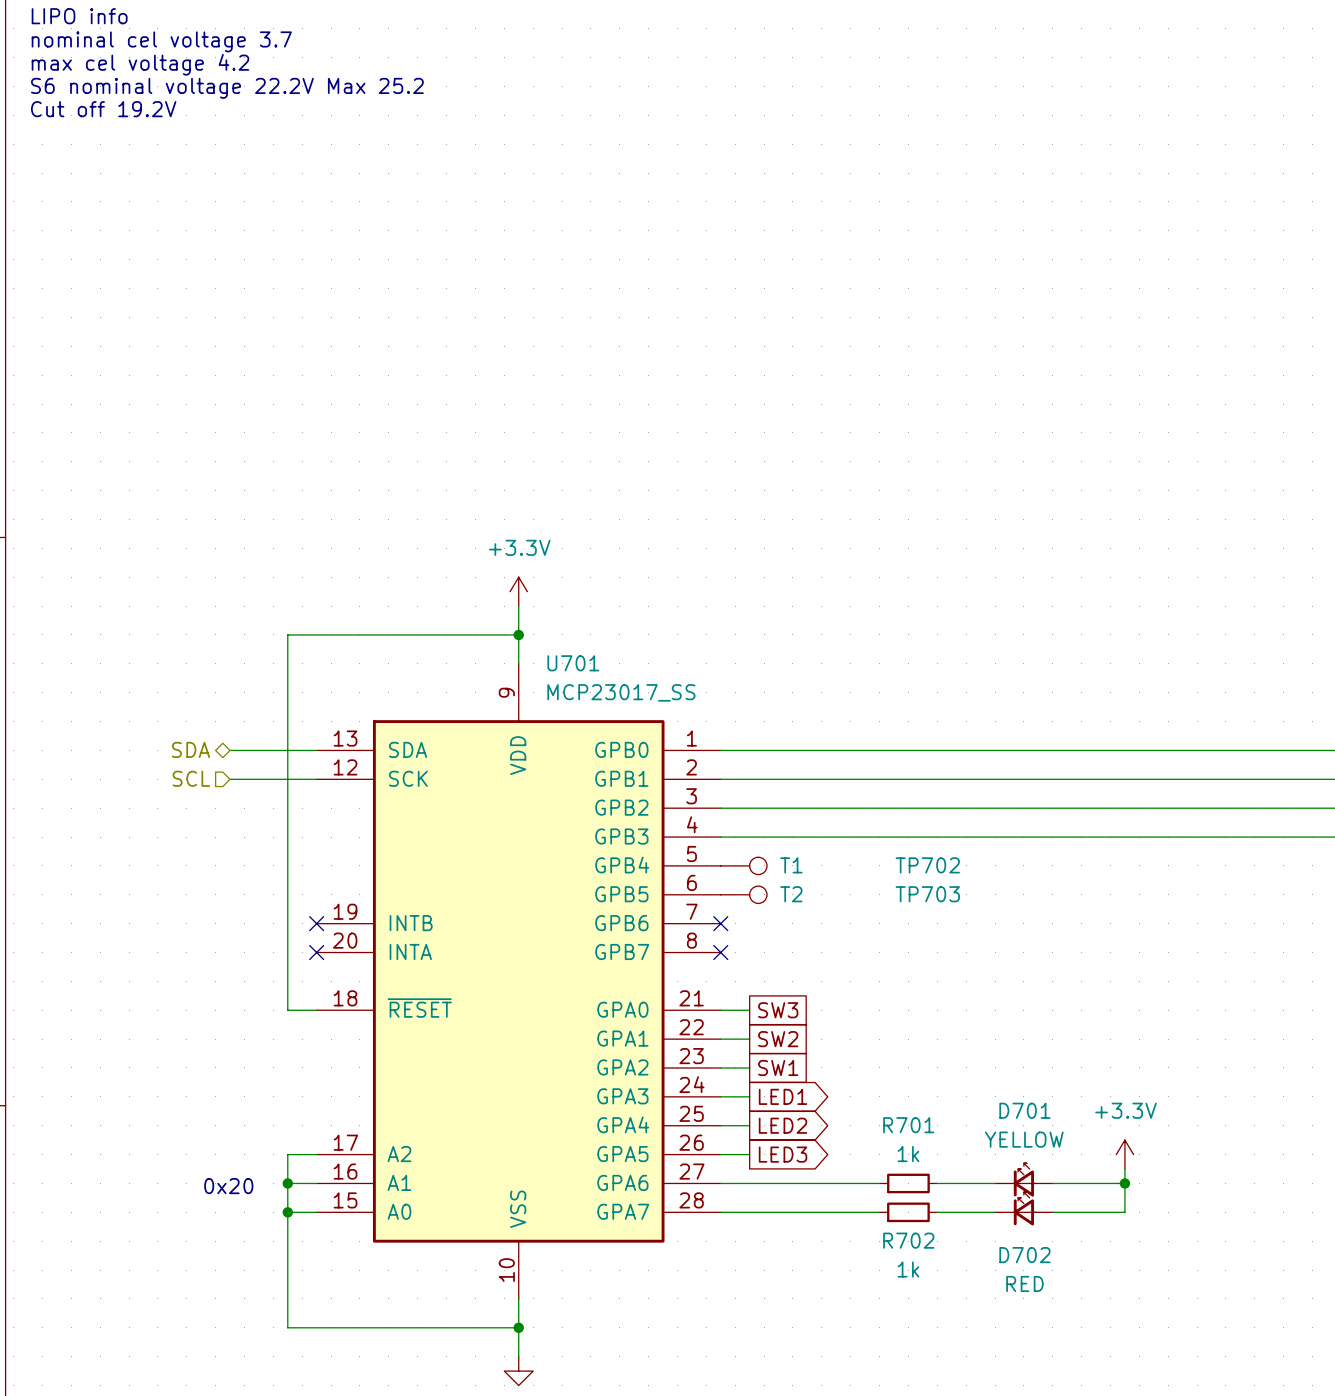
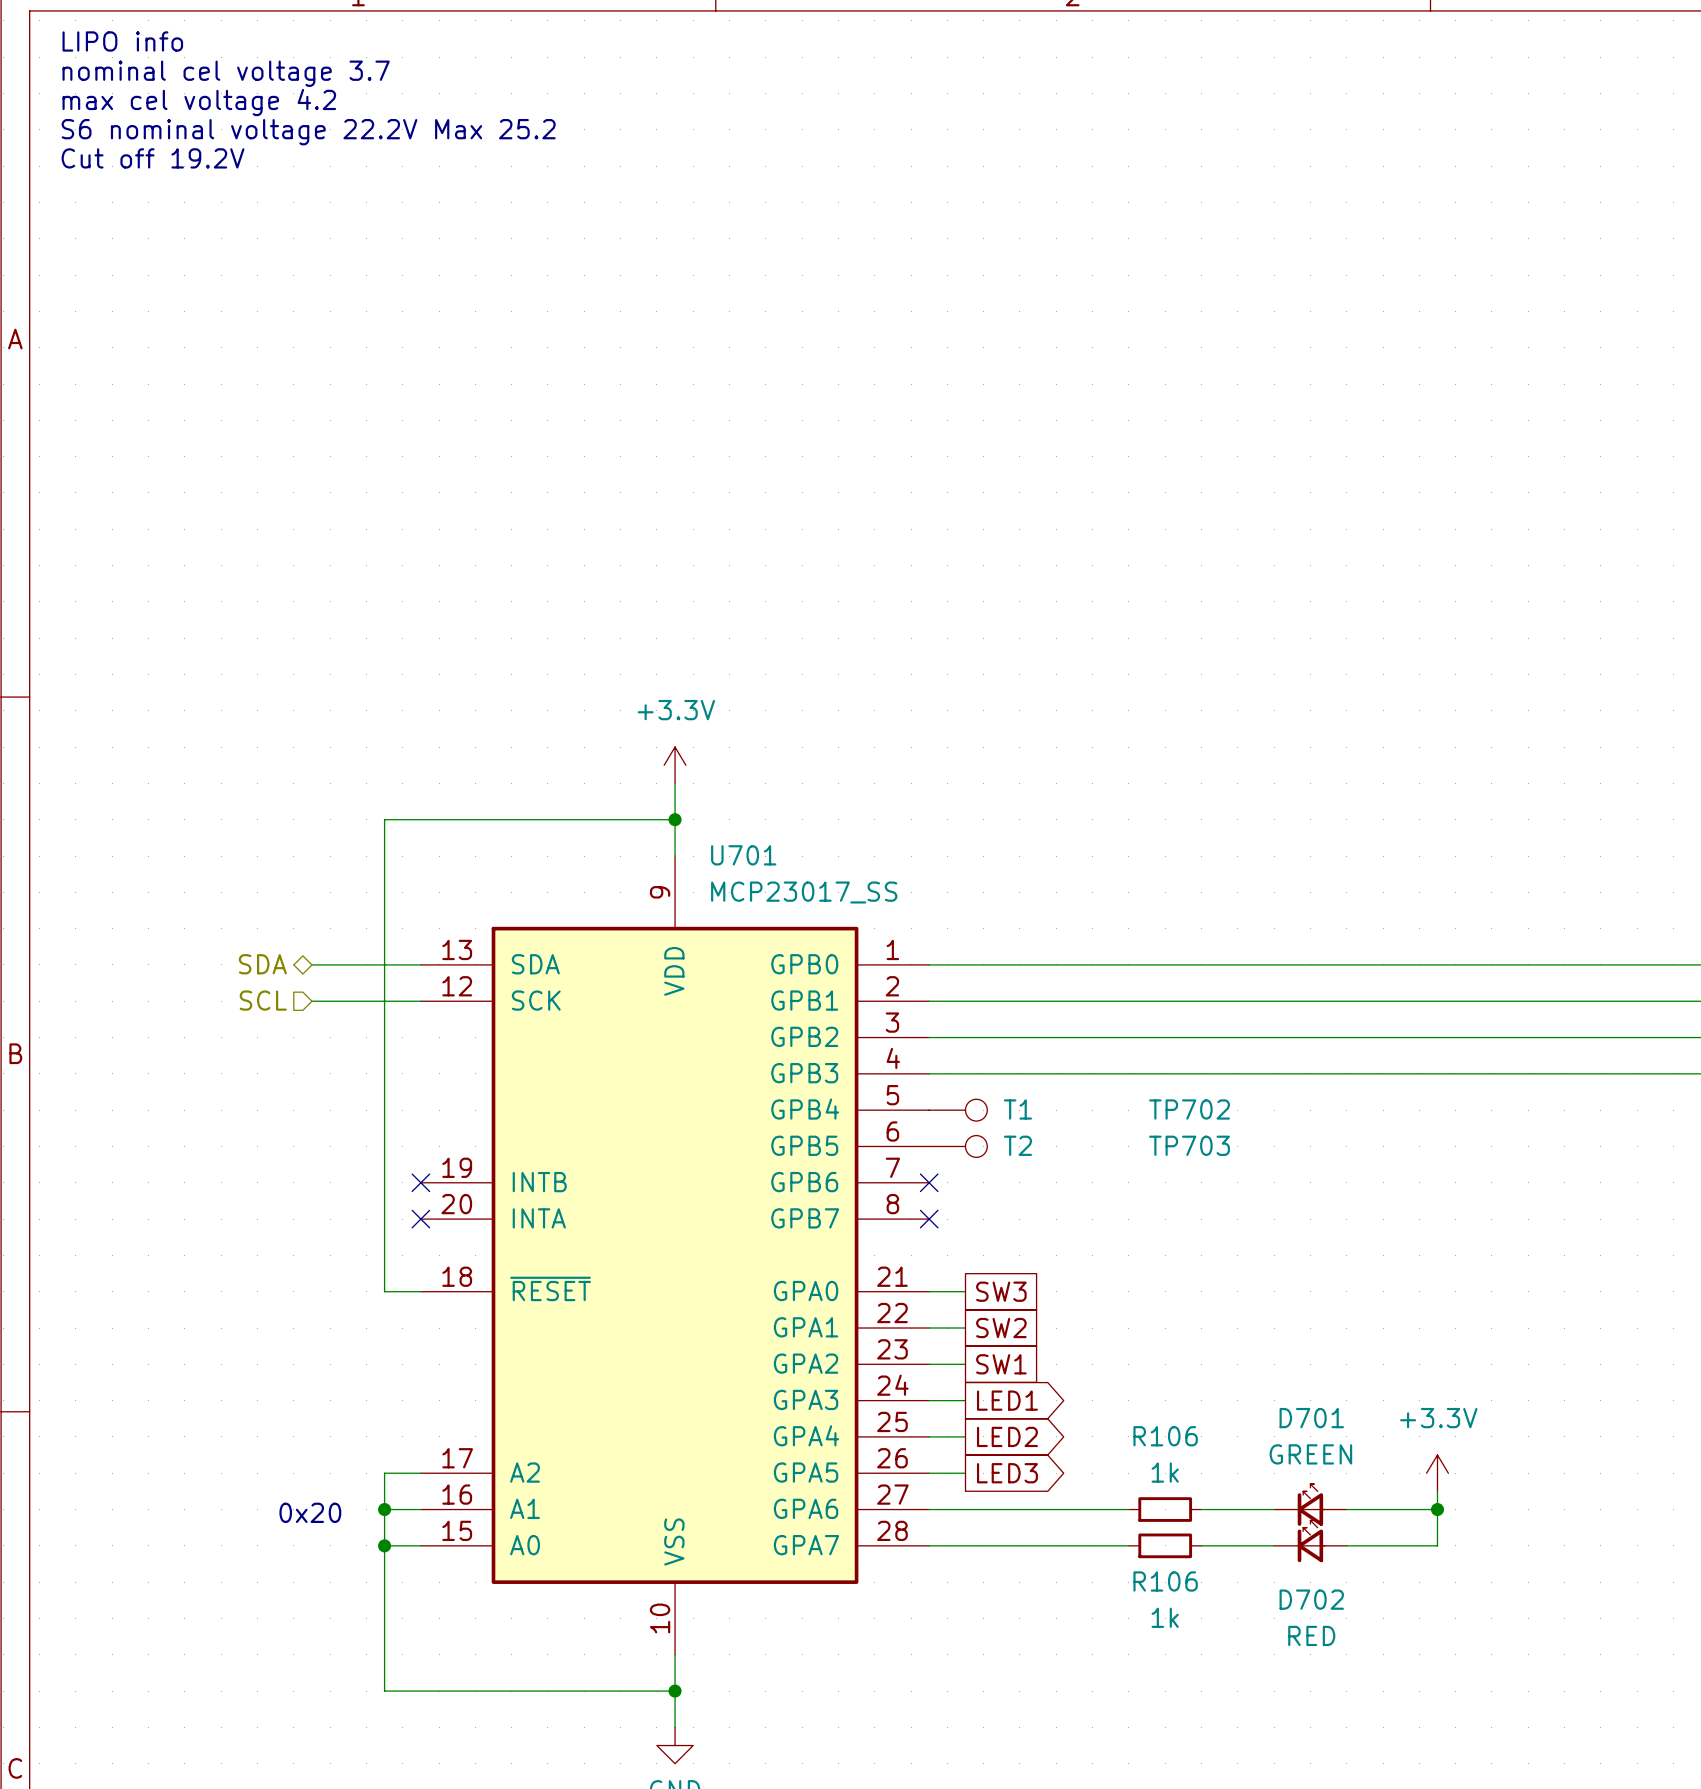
R701 name: R701 (908, 1125) -> R106 (1165, 1436)
D701 value: YELLOW (1024, 1139) -> GREEN (1310, 1454)
R702 name: R702 (908, 1240) -> R106 (1165, 1581)

